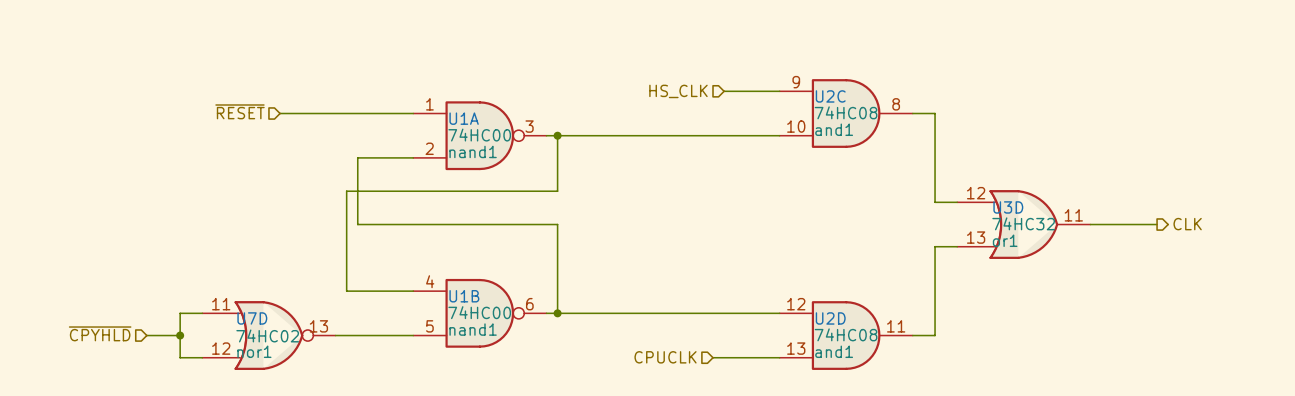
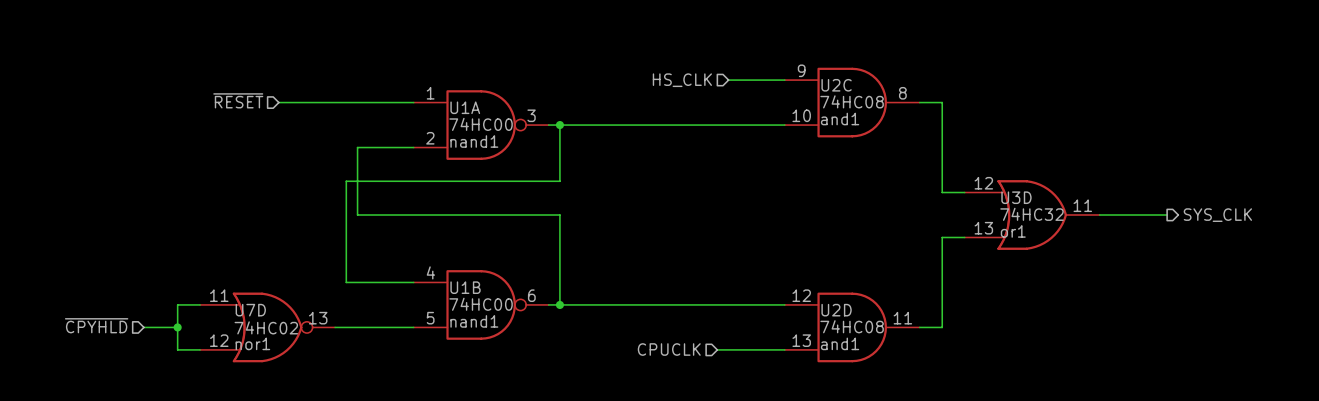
hierarchical label: CLK (1187, 224) -> SYS_CLK (1217, 215)

